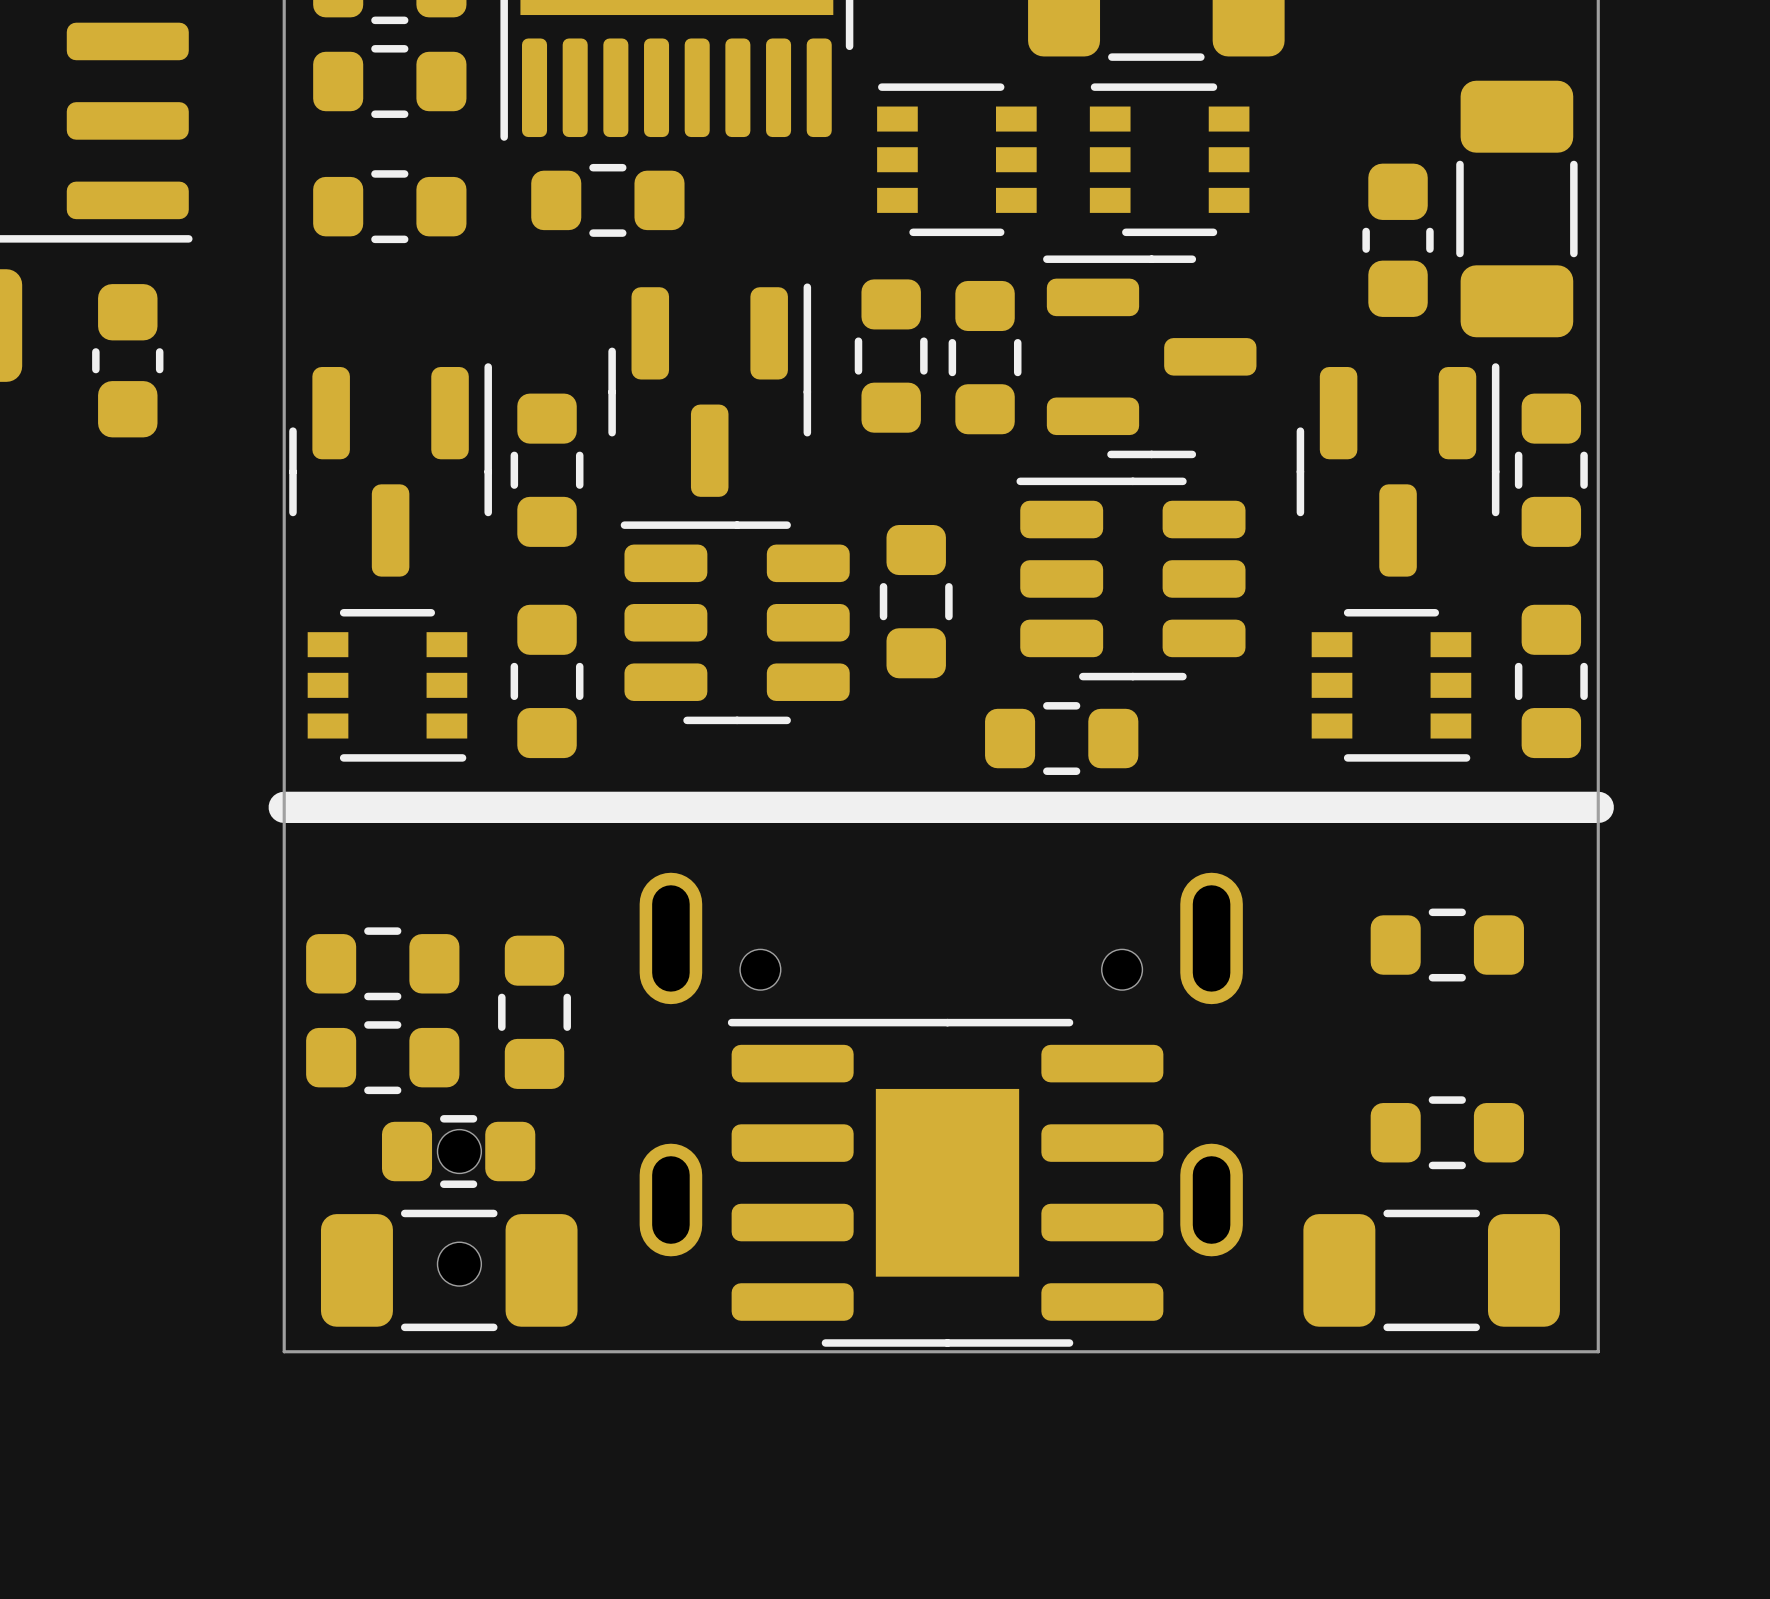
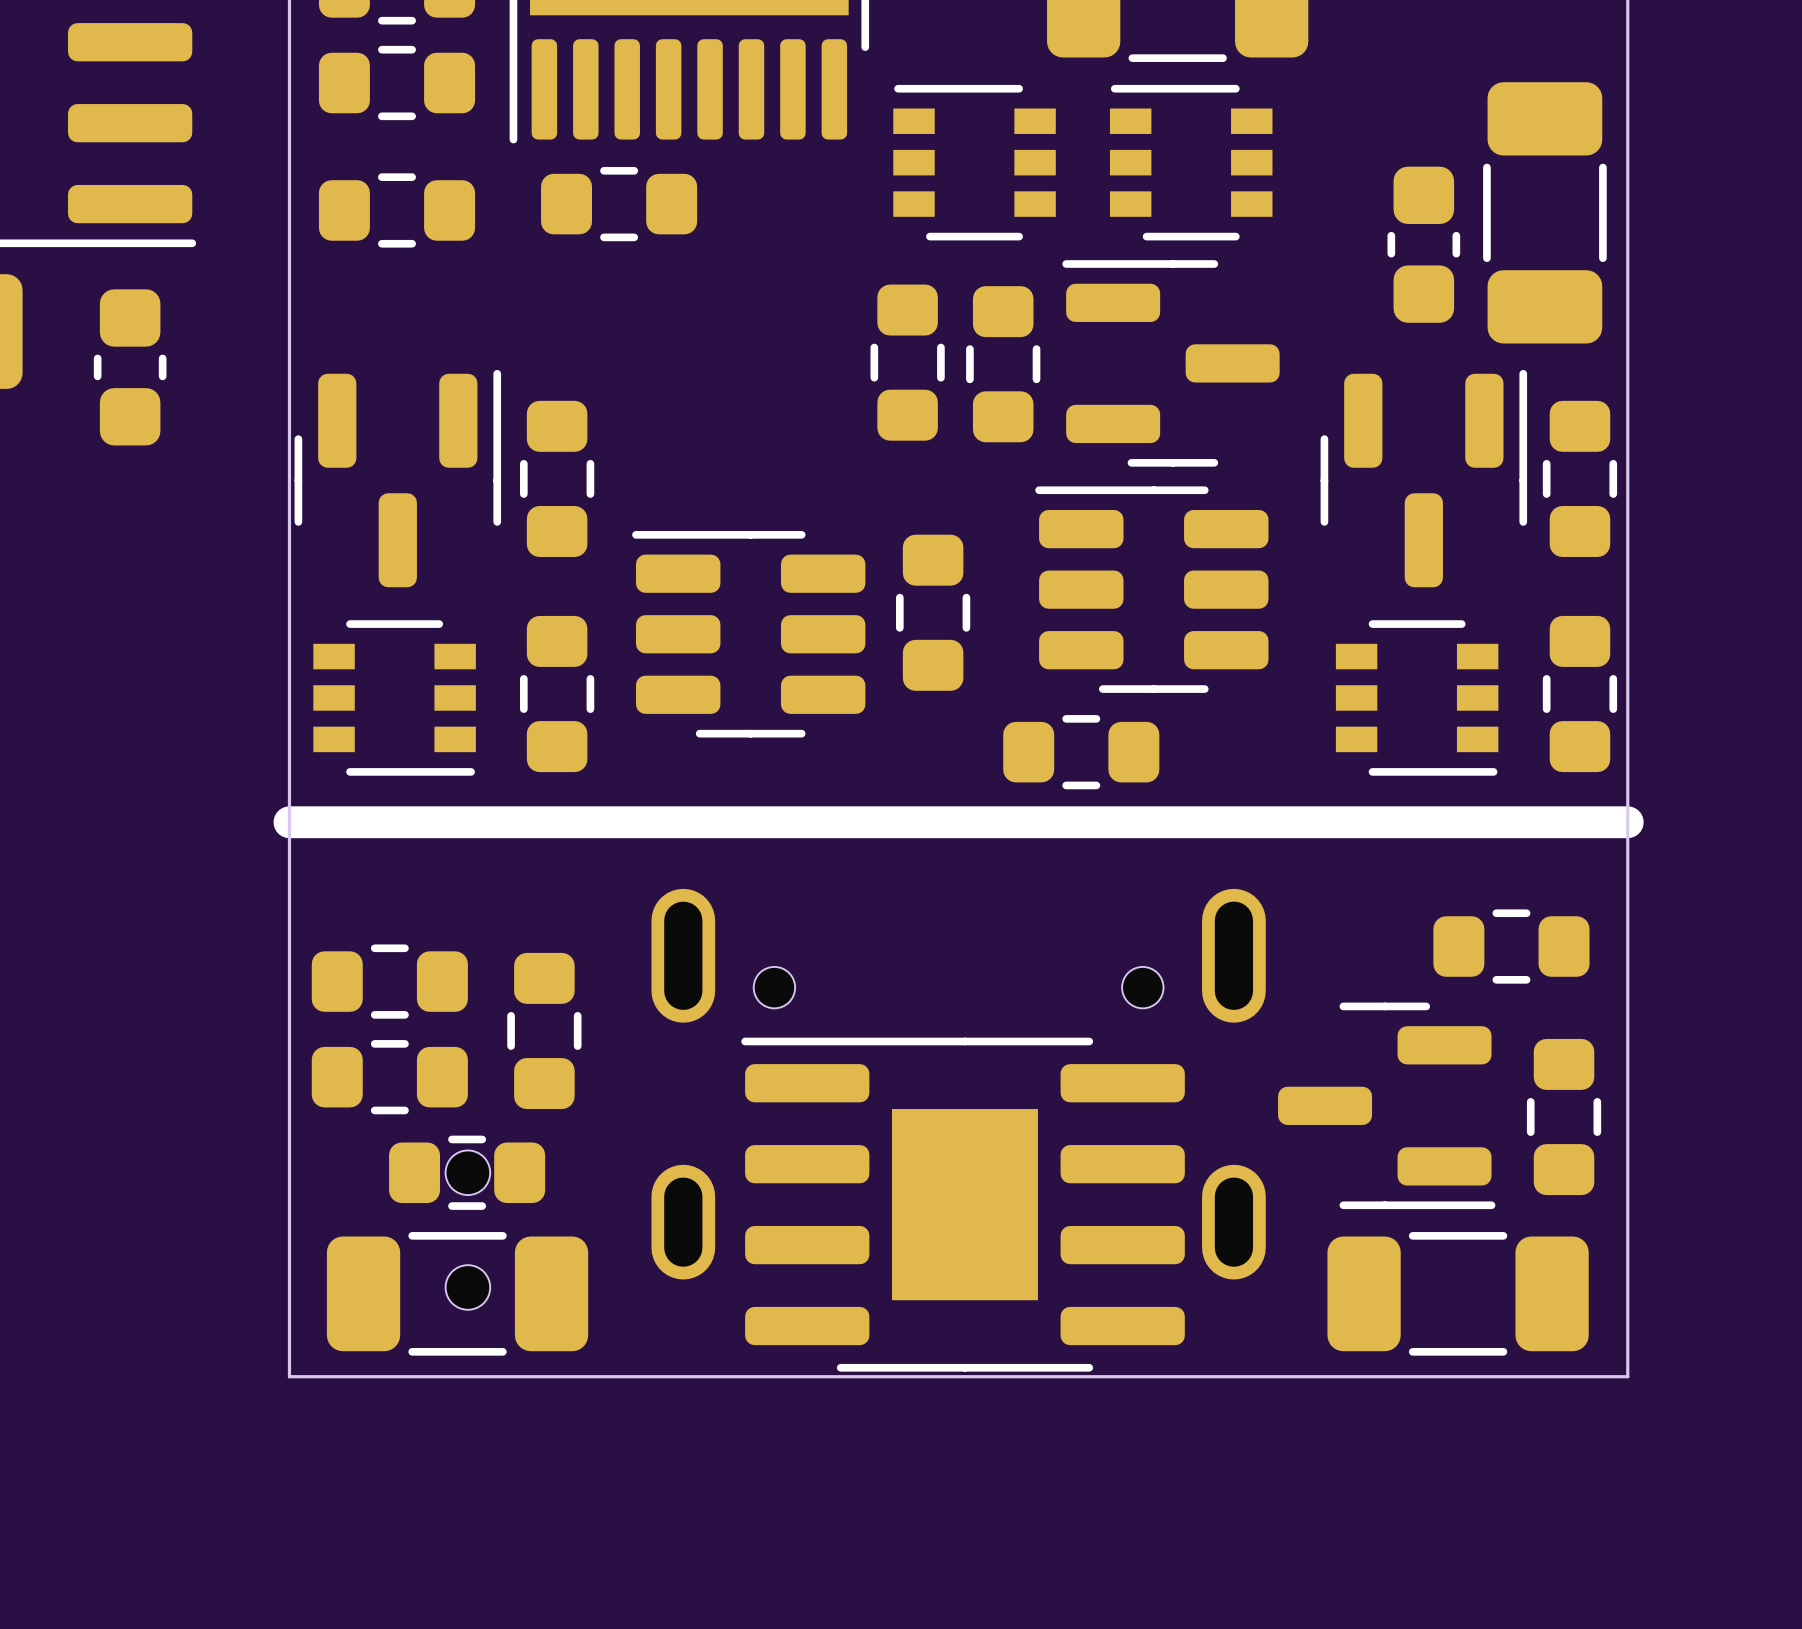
part rotation: 0° (709, 390) -> 90° clockwise (1386, 1105)
part position: (709, 390) -> (1386, 1105)
part position: (1447, 945) -> (1511, 946)
part rotation: 0° (1447, 1132) -> 90° clockwise (1564, 1117)
part position: (1447, 1132) -> (1564, 1117)

